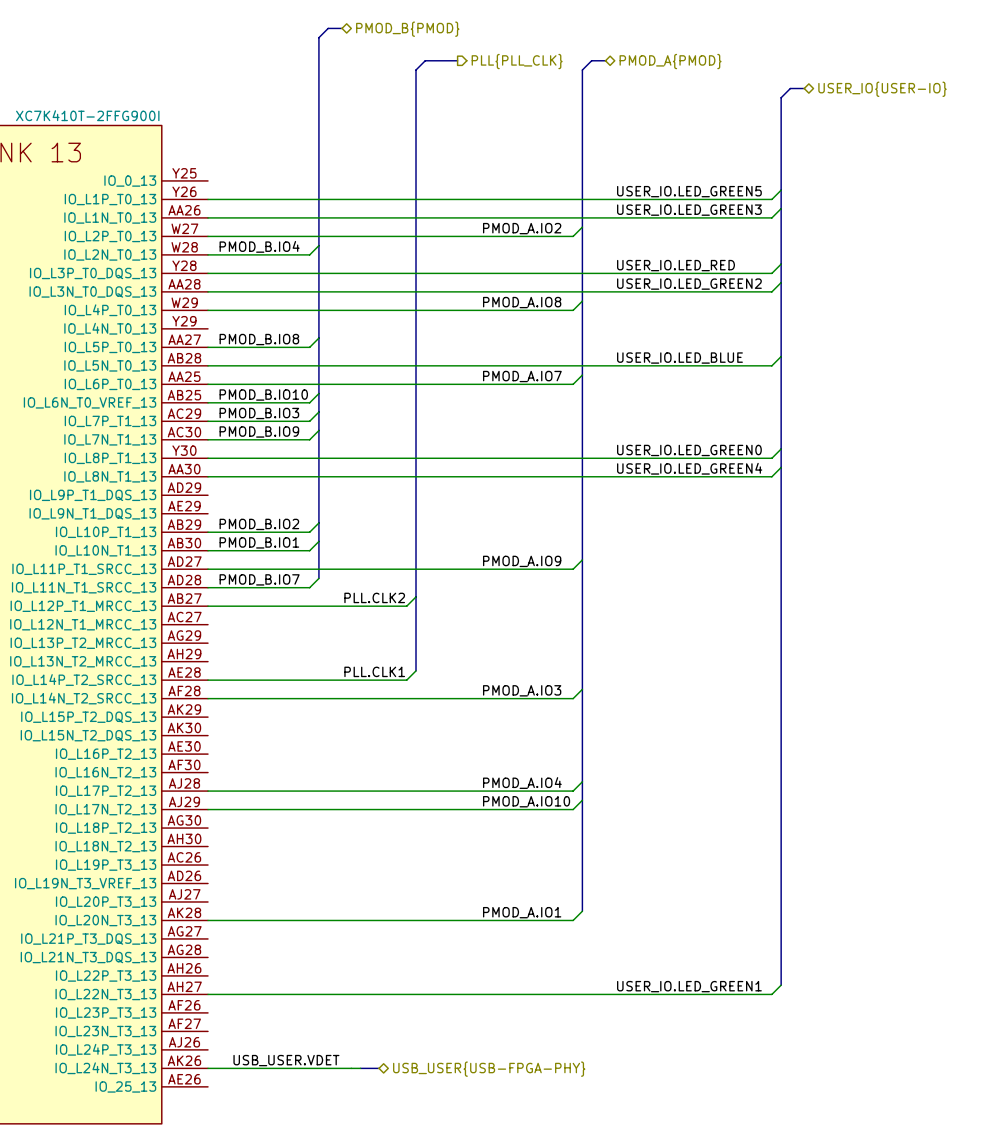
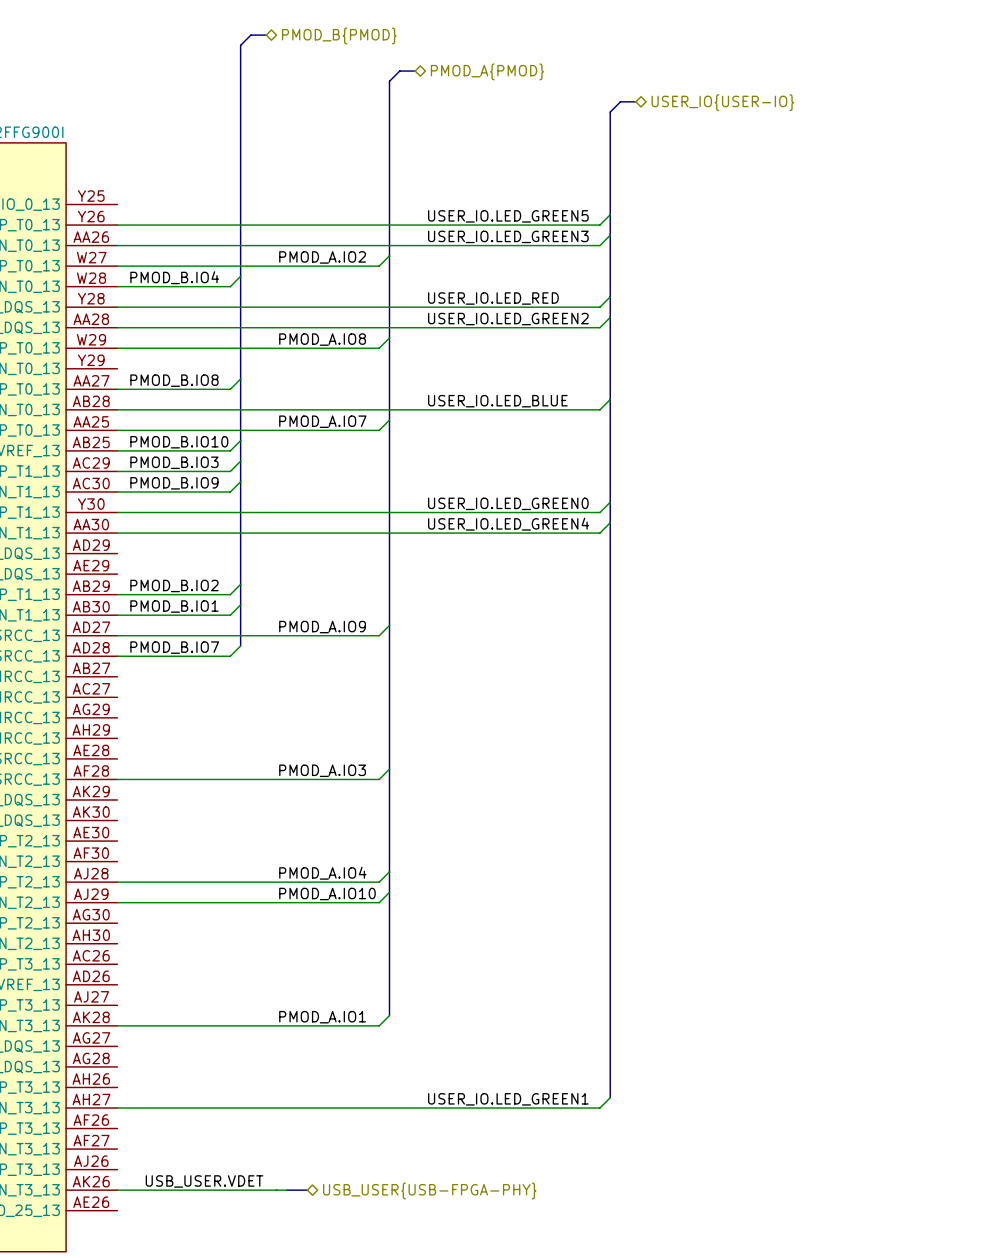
bus: (457, 60) (425, 60) (416, 70) (416, 670) -> none
bus: (605, 60) (591, 60) (582, 70) (582, 911) -> (415, 71) (399, 71) (389, 81) (389, 1015)
hierarchical label: PLL{PLL_CLK} (517, 61) -> none
hierarchical label position: PMOD_A{PMOD} (670, 61) -> PMOD_A{PMOD} (487, 71)
bus: (804, 88) (790, 88) (781, 97) (781, 985) -> (635, 101) (620, 101) (610, 112) (610, 1097)
hierarchical label position: USER_IO{USER-IO} (882, 89) -> USER_IO{USER-IO} (722, 102)
wire: (781, 190) (771, 199) (642, 199) -> (610, 214) (599, 225)
label position: USER_IO.LED_GREEN5 (689, 191) -> USER_IO.LED_GREEN5 (508, 216)
wire: (781, 208) (771, 217) (642, 217) -> (610, 235) (599, 245)
label position: USER_IO.LED_GREEN3 (689, 210) -> USER_IO.LED_GREEN3 (508, 236)
wire: (582, 227) (573, 236) -> none
label position: PMOD_A.IO2 (522, 228) -> PMOD_A.IO2 (322, 257)
wire: (443, 236) (573, 236) -> (379, 266) (389, 255)
wire: (781, 264) (771, 273) (642, 273) -> (610, 296) (599, 307)
label position: USER_IO.LED_RED (676, 265) -> USER_IO.LED_RED (493, 298)
wire: (781, 282) (771, 291) (642, 291) -> (610, 317) (599, 327)
label position: USER_IO.LED_GREEN2 (689, 284) -> USER_IO.LED_GREEN2 (508, 319)
wire: (582, 301) (573, 310) -> none
label position: PMOD_A.IO8 (522, 302) -> PMOD_A.IO8 (322, 339)
wire: (443, 310) (573, 310) -> (379, 348) (389, 337)
wire: (781, 356) (771, 365) (642, 365) -> (610, 399) (599, 409)
label position: USER_IO.LED_BLUE (679, 358) -> USER_IO.LED_BLUE (497, 401)
wire: (582, 375) (573, 384) -> none
label position: PMOD_A.IO7 (522, 376) -> PMOD_A.IO7 (322, 421)
wire: (443, 384) (573, 384) -> (379, 430) (389, 420)
wire: (781, 449) (771, 458) (642, 458) -> (610, 502) (599, 512)
label position: USER_IO.LED_GREEN0 (689, 450) -> USER_IO.LED_GREEN0 (508, 503)
wire: (781, 467) (771, 476) (642, 476) -> (610, 522) (599, 533)
label position: USER_IO.LED_GREEN4 (689, 468) -> USER_IO.LED_GREEN4 (508, 524)
wire: (582, 559) (573, 569) -> none
label position: PMOD_A.IO9 (522, 561) -> PMOD_A.IO9 (322, 627)
wire: (443, 569) (573, 569) -> (379, 635) (389, 625)
wire: (416, 596) (406, 606) (208, 606) -> none
label: PLL.CLK2 (374, 597) -> none
wire: (416, 670) (406, 680) (208, 680) -> none
label: PLL.CLK1 (374, 671) -> none
wire: (582, 689) (573, 698) -> none
label position: PMOD_A.IO3 (522, 690) -> PMOD_A.IO3 (322, 770)
wire: (443, 698) (573, 698) -> (379, 779) (389, 769)
wire: (582, 781) (573, 791) -> none
label position: PMOD_A.IO4 (522, 783) -> PMOD_A.IO4 (322, 873)
wire: (443, 791) (573, 791) -> (379, 882) (389, 871)
wire: (582, 800) (573, 809) -> none
label position: PMOD_A.IO10 (526, 801) -> PMOD_A.IO10 (327, 893)
wire: (443, 809) (573, 809) -> (379, 902) (389, 892)
wire: (582, 911) (573, 920) -> none
label position: PMOD_A.IO1 (522, 912) -> PMOD_A.IO1 (322, 1017)
wire: (443, 920) (573, 920) -> (379, 1025) (389, 1015)
wire: (781, 985) (771, 994) (642, 994) -> (610, 1097) (599, 1108)
label position: USER_IO.LED_GREEN1 (689, 986) -> USER_IO.LED_GREEN1 (508, 1099)

